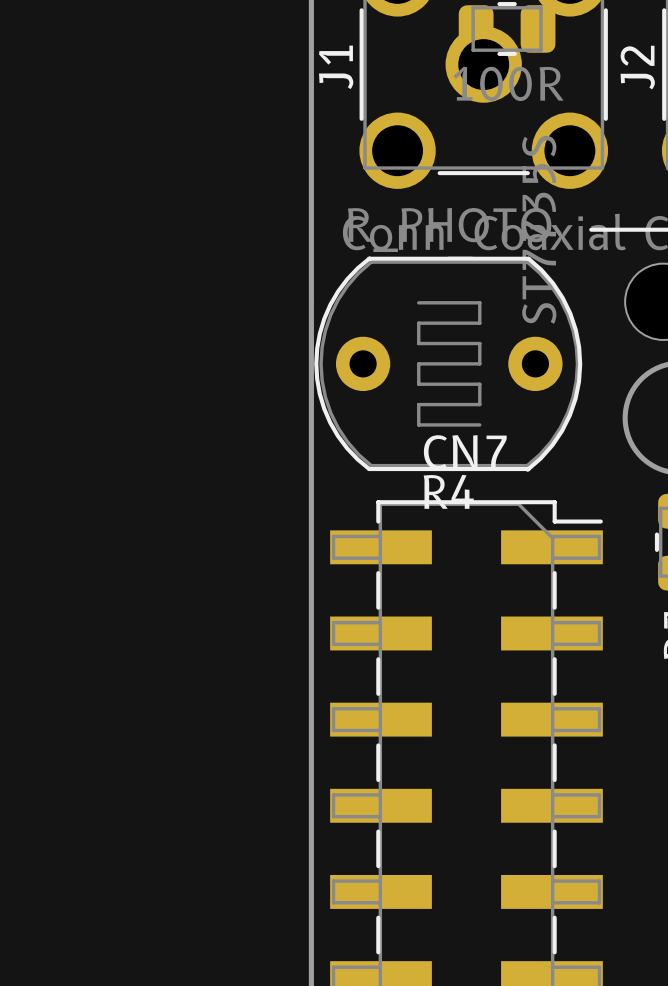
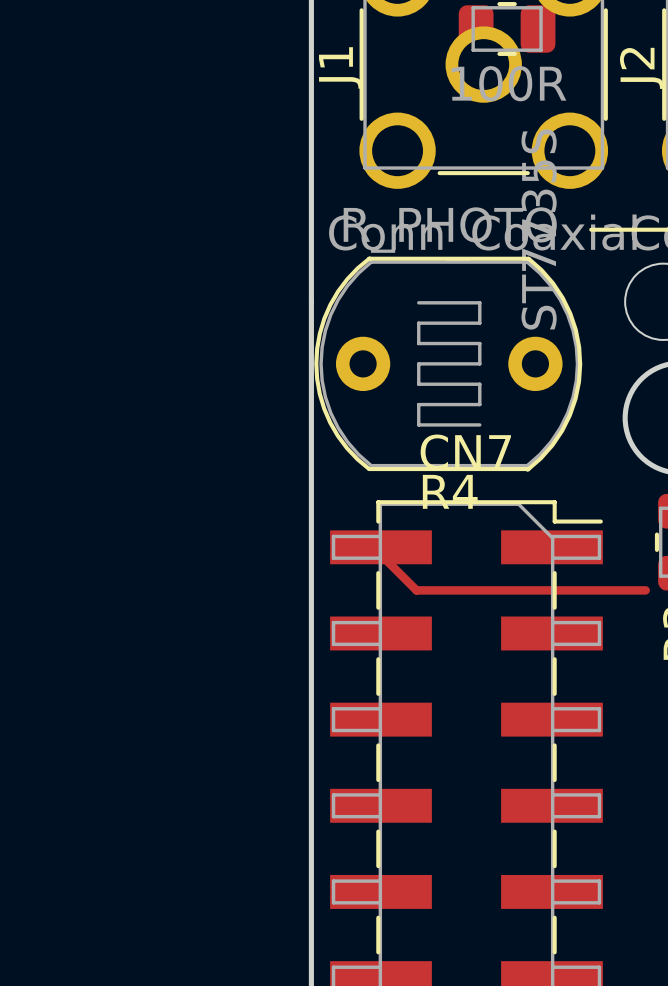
track: none -> (381, 554) (416, 590) (645, 590)

